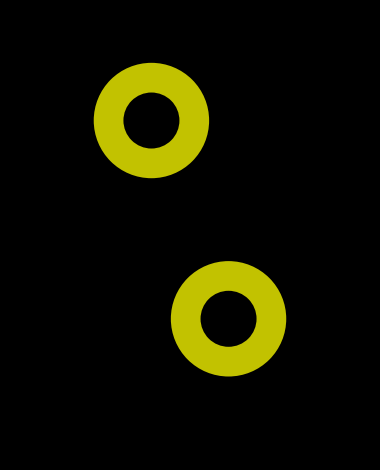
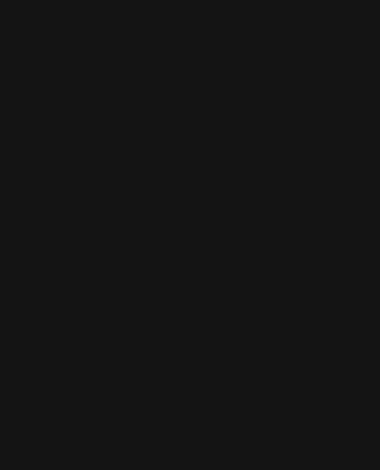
part: (151, 120) -> none
part: (228, 318) -> none

